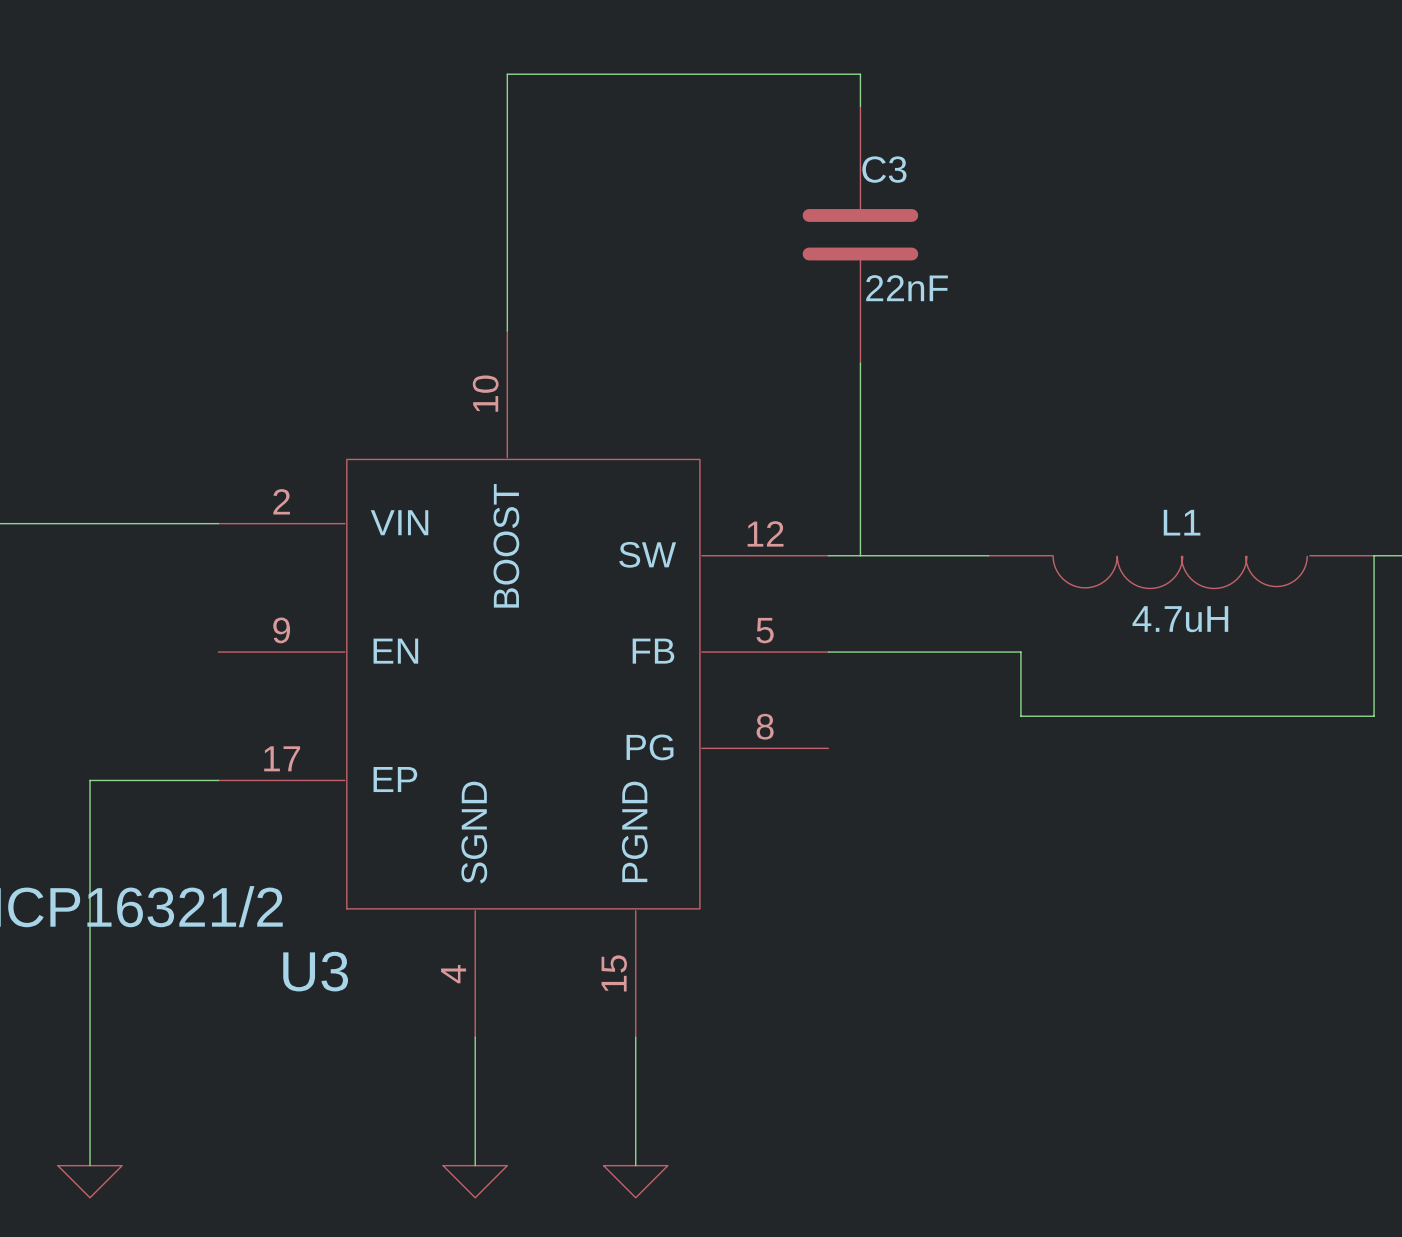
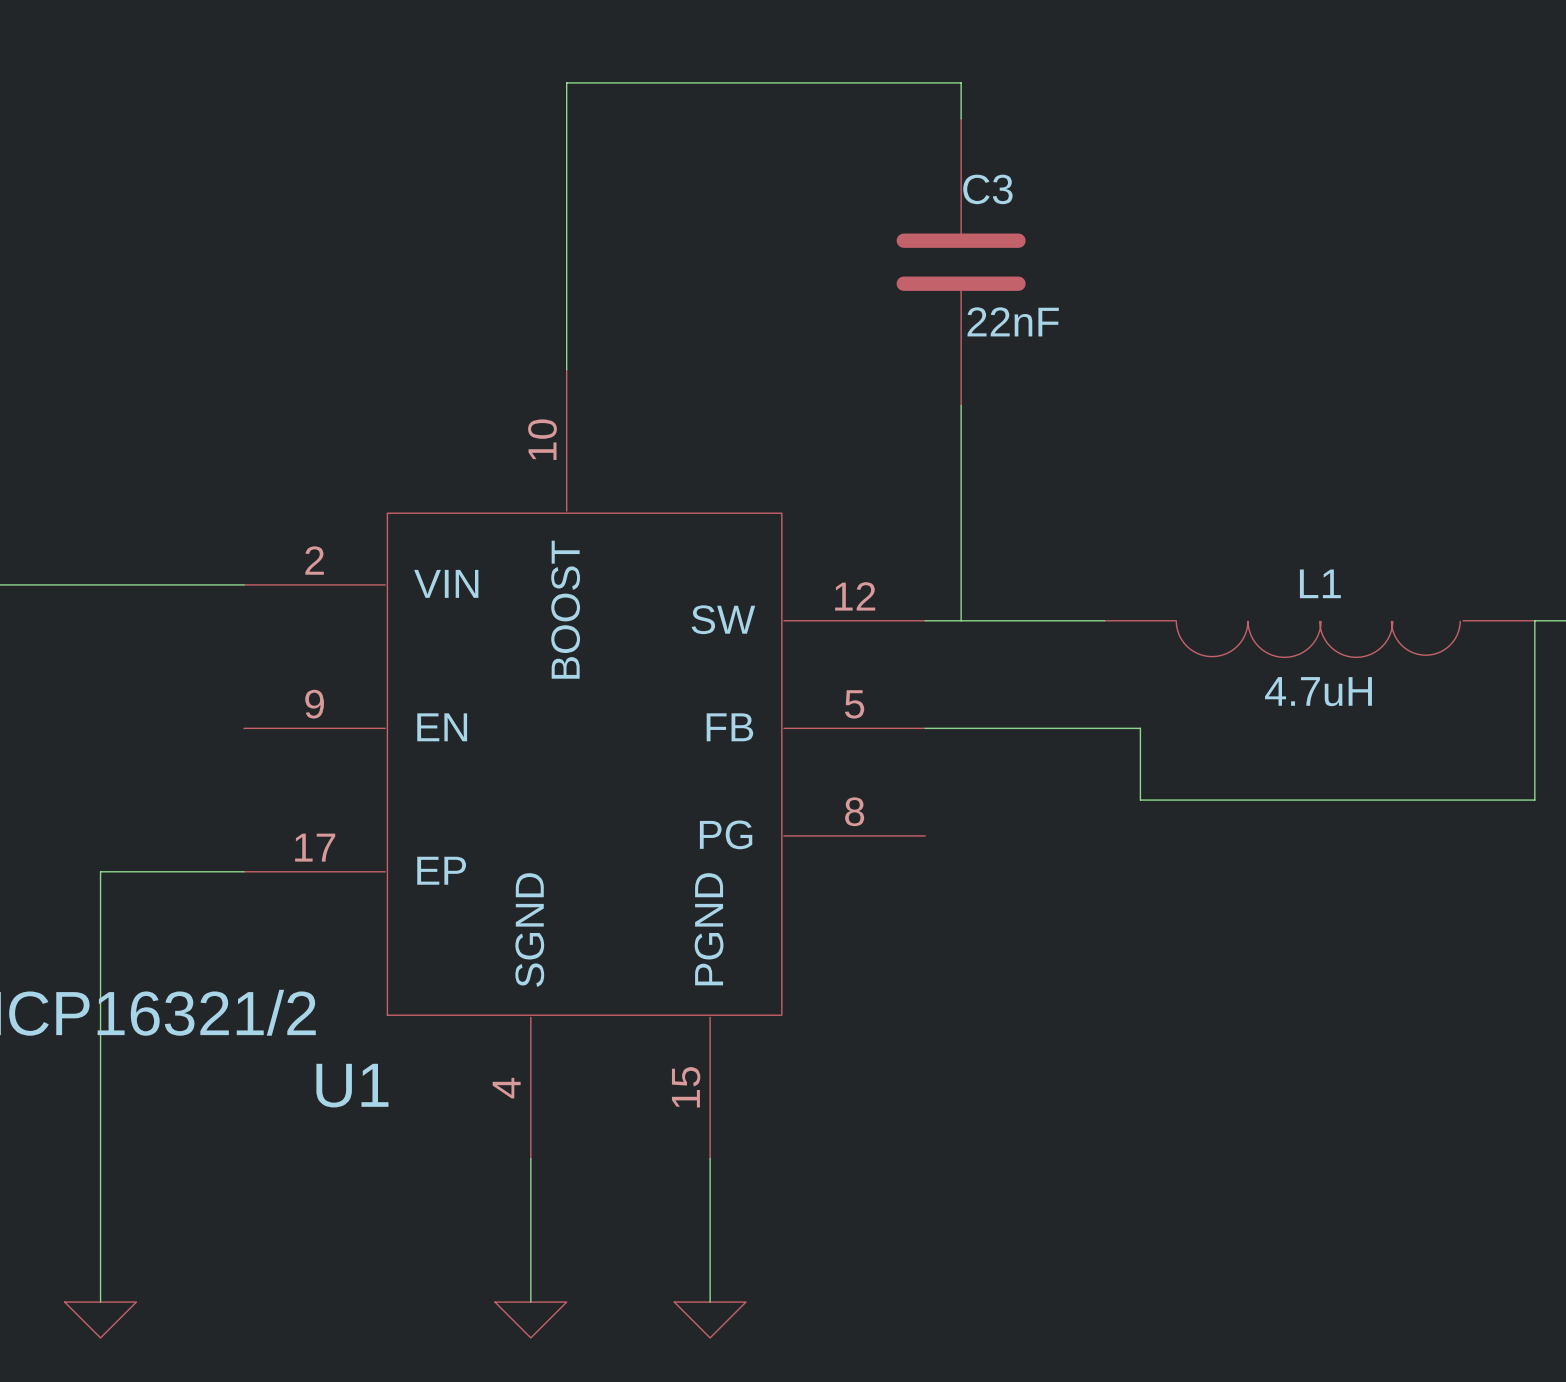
U3 name: U3 (315, 971) -> U1 (352, 1085)

